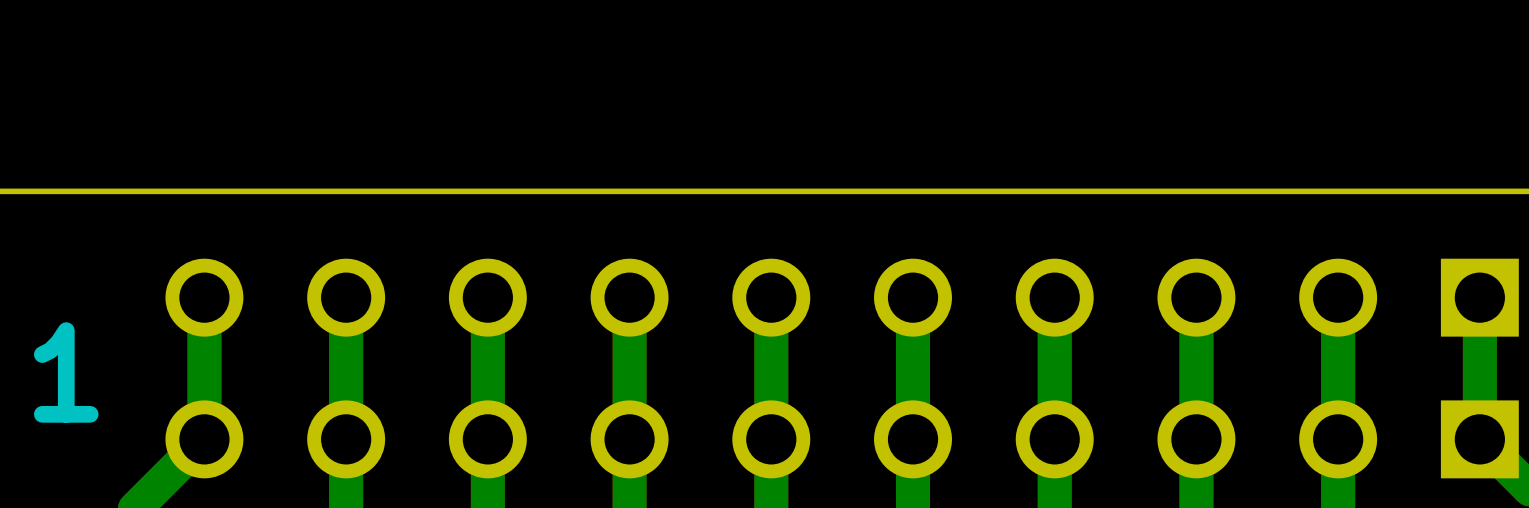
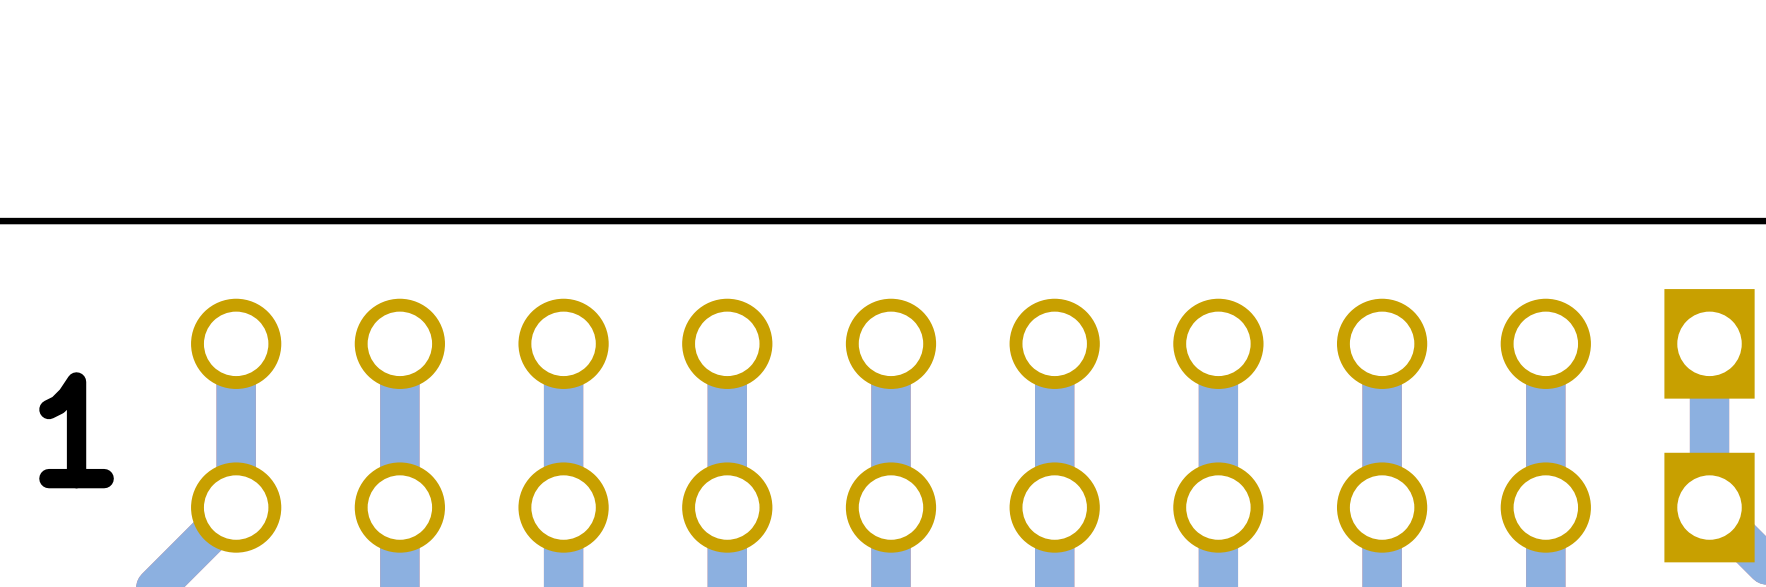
part footprint: [165, 258, 1519, 337] -> [191, 289, 1755, 399]
part footprint: [165, 400, 1519, 479] -> [191, 452, 1755, 563]

